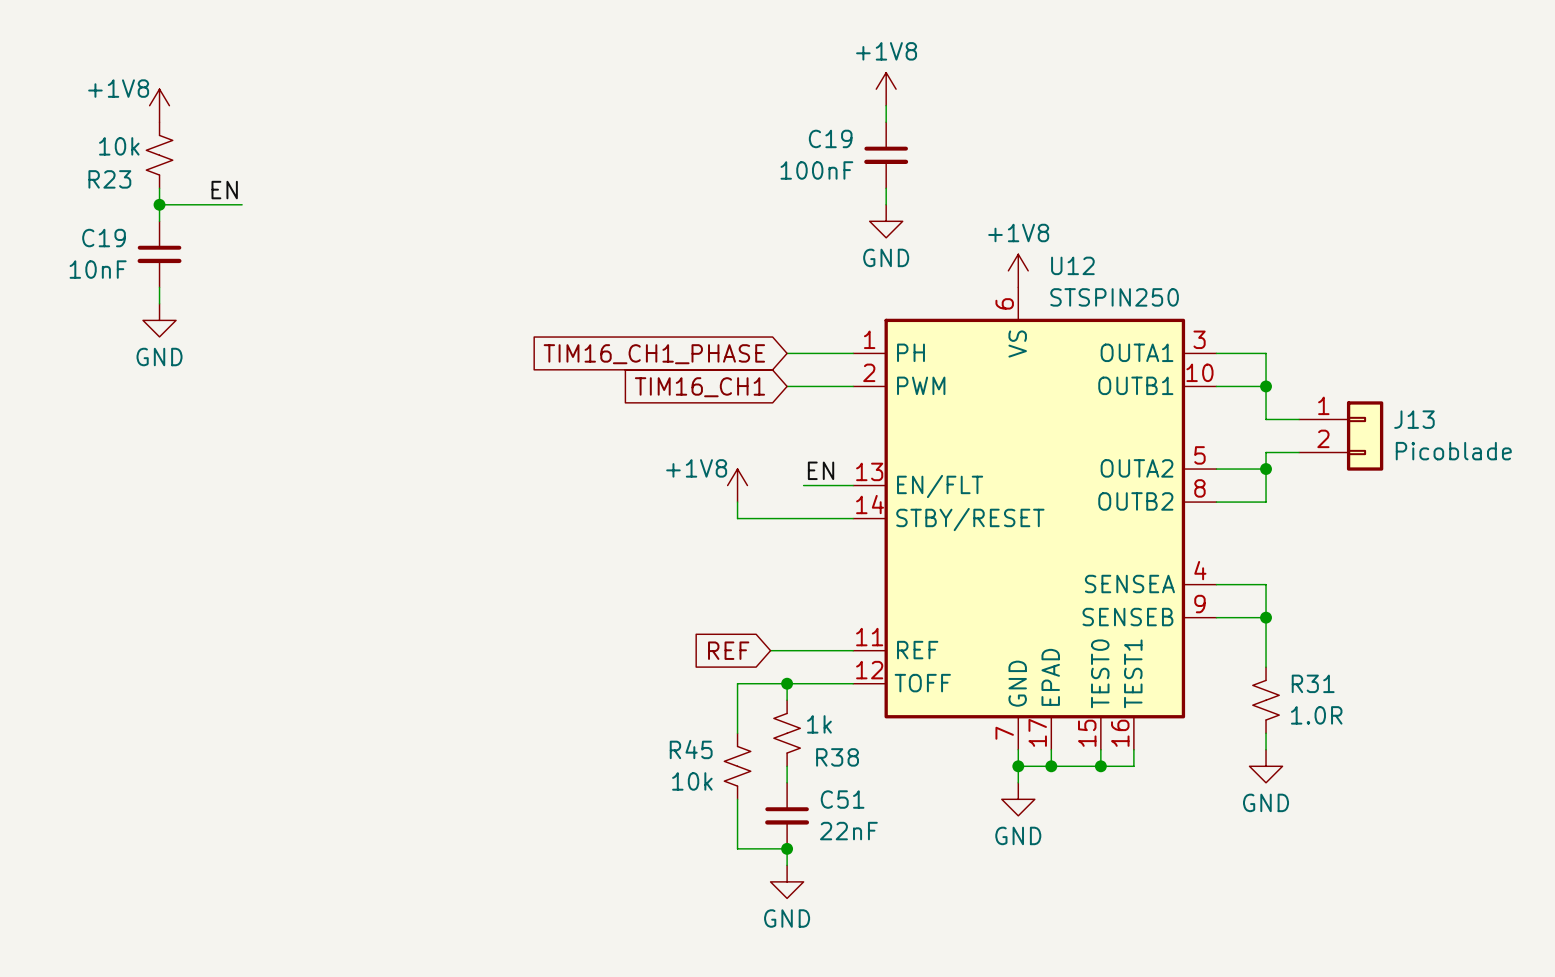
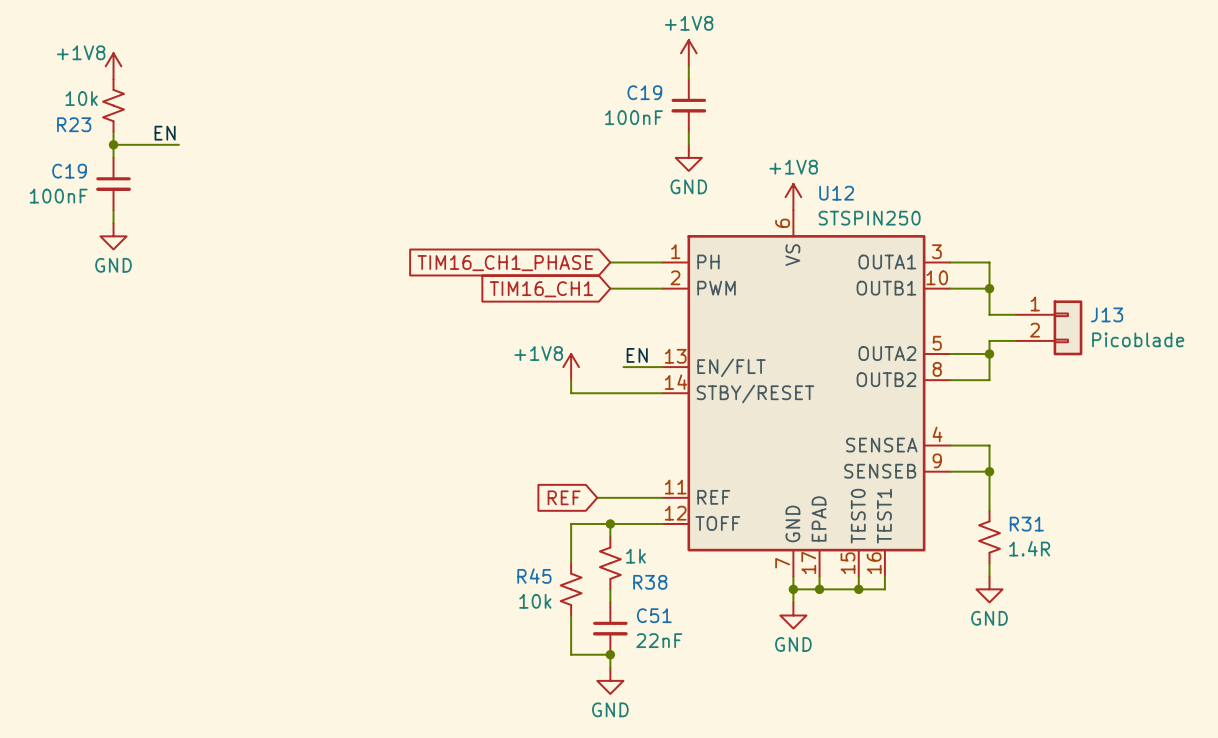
C19 value: 10nF (98, 269) -> 100nF (58, 196)
R31 value: 1.0R (1316, 715) -> 1.4R (1029, 548)

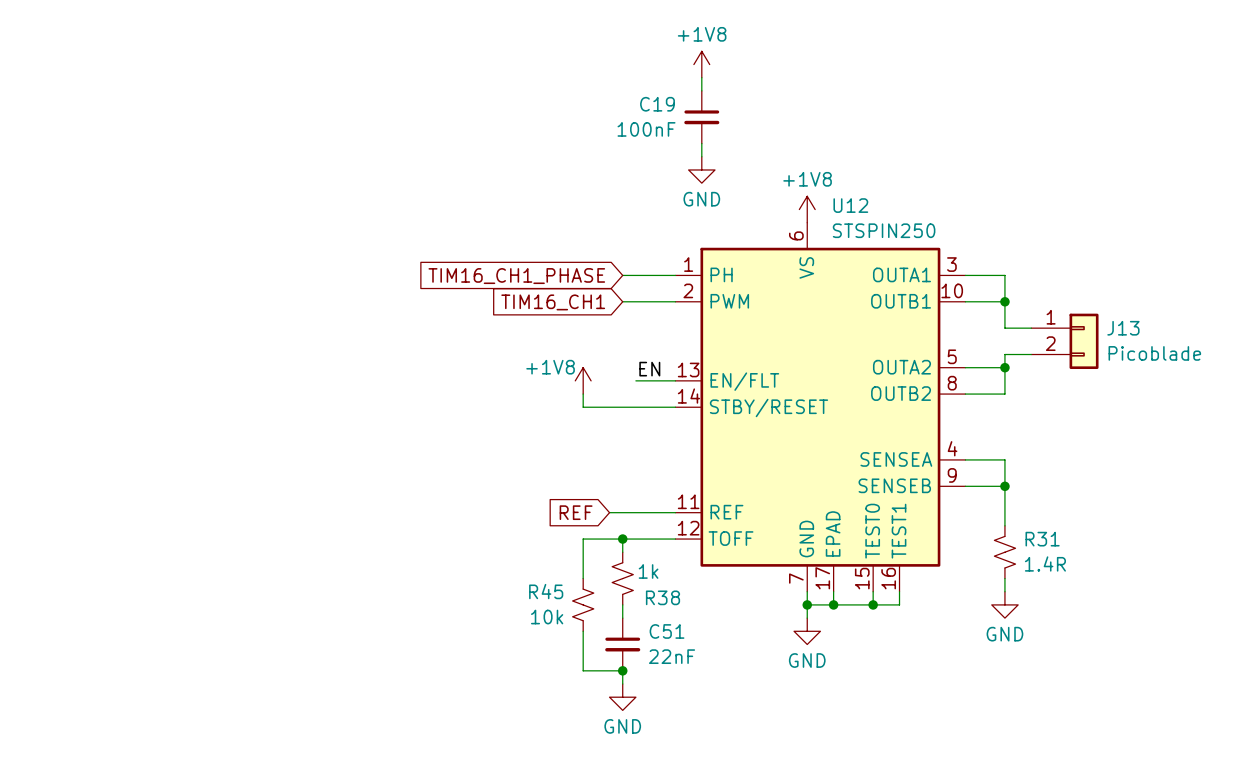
power symbol: +1V8 (113, 66) -> none
R23: 10k (113, 105) -> none
wire: (113, 131) (113, 157) -> none
label: EN (165, 133) -> none
wire: (113, 144) (178, 144) -> none
junction: (113, 144) -> none
C19: 100nF (113, 184) -> none
wire: (113, 210) (113, 223) -> none
power symbol: GND (113, 236) -> none

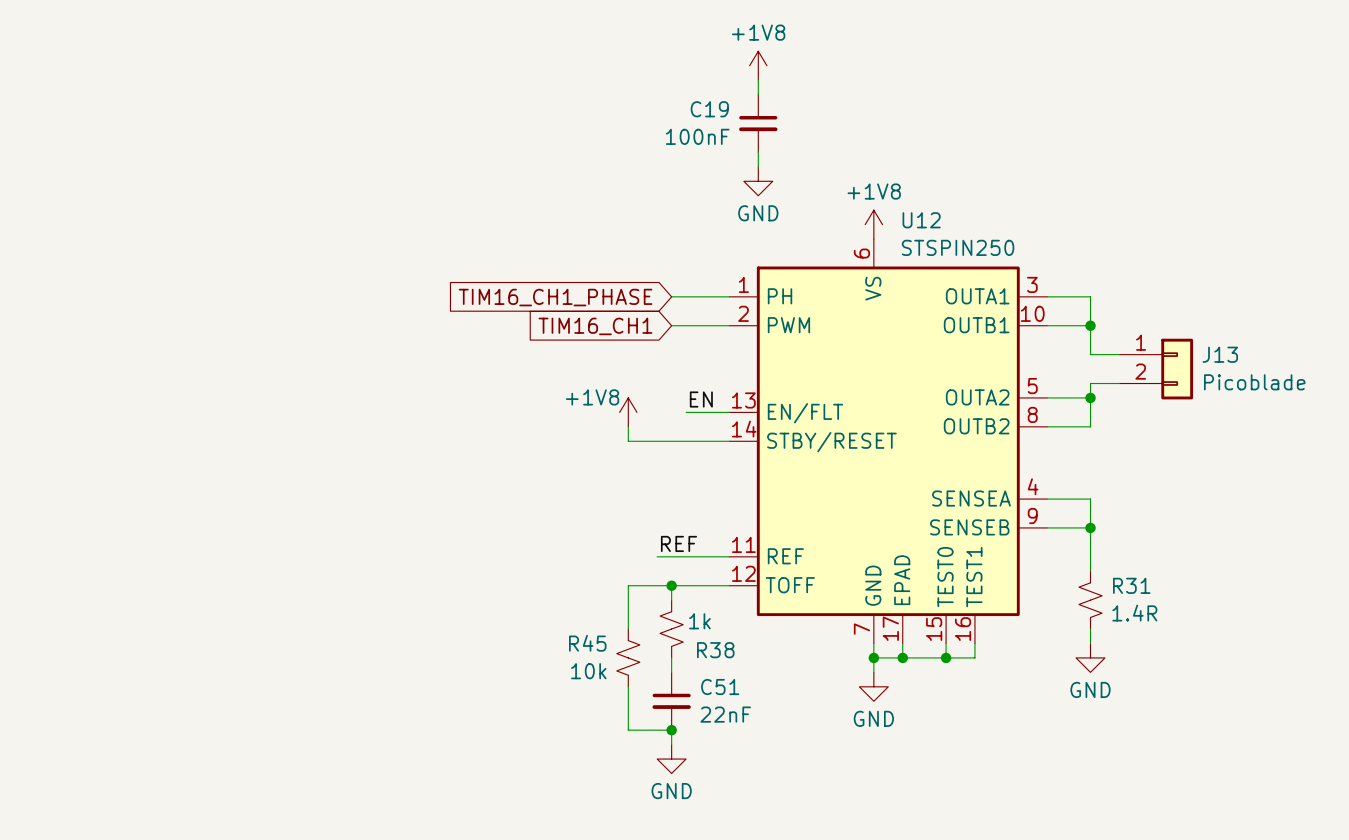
label: none -> REF (678, 543)
global label: REF (576, 512) -> none

